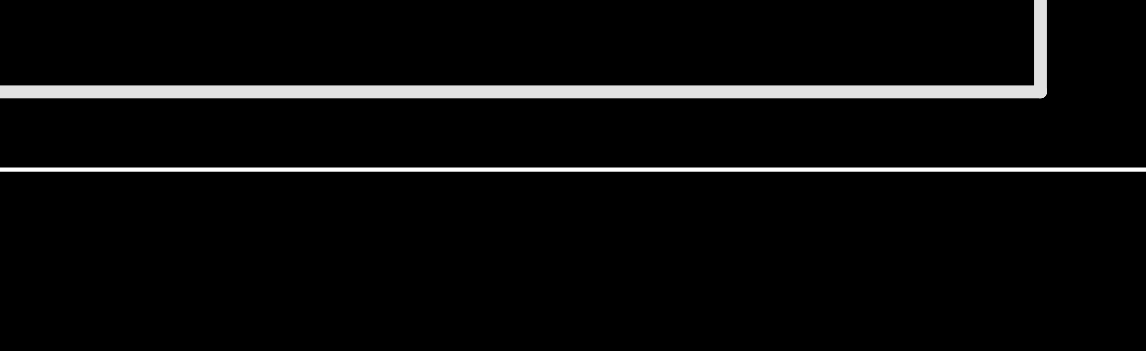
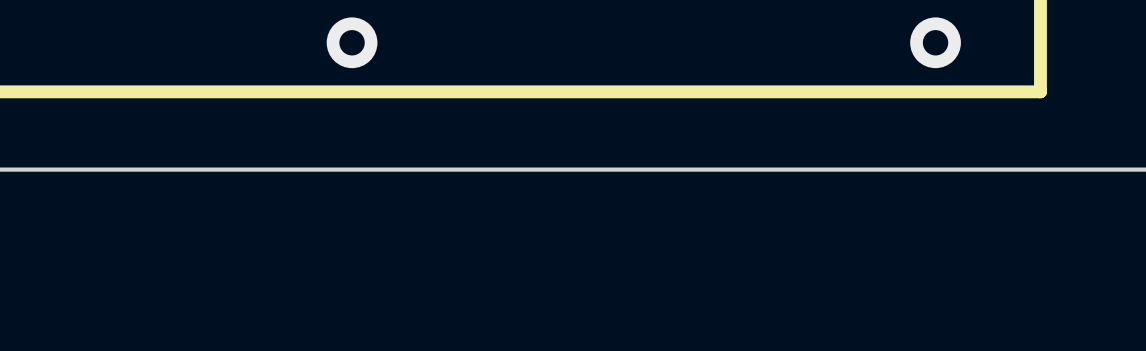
via: none -> (352, 42)
via: none -> (935, 42)

